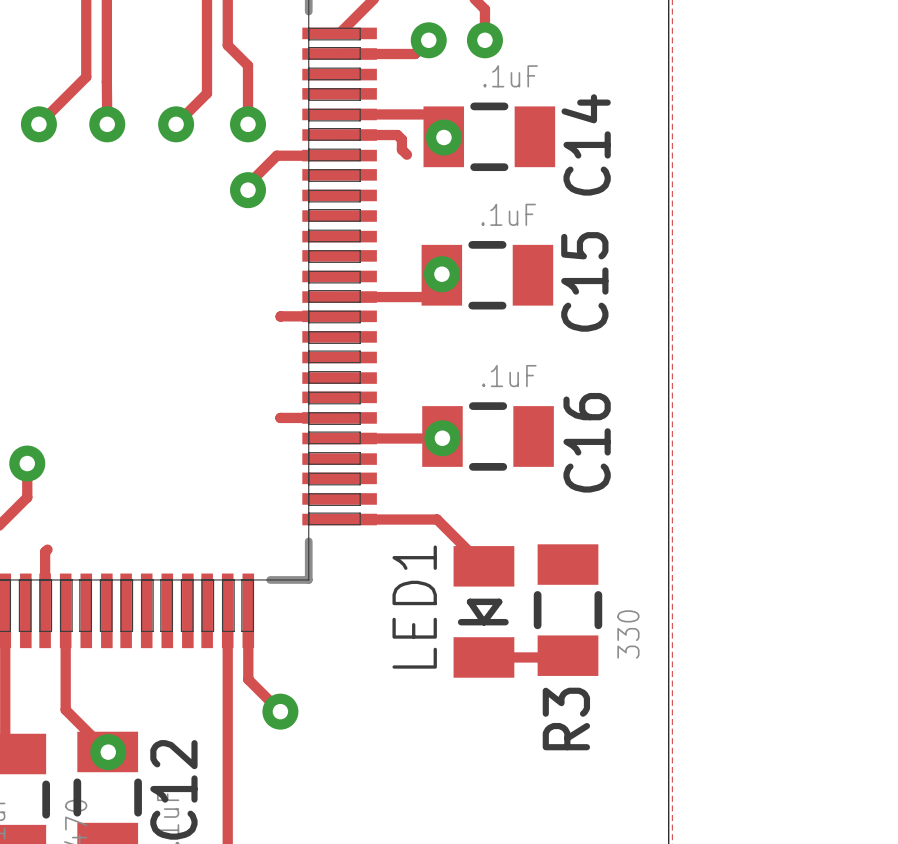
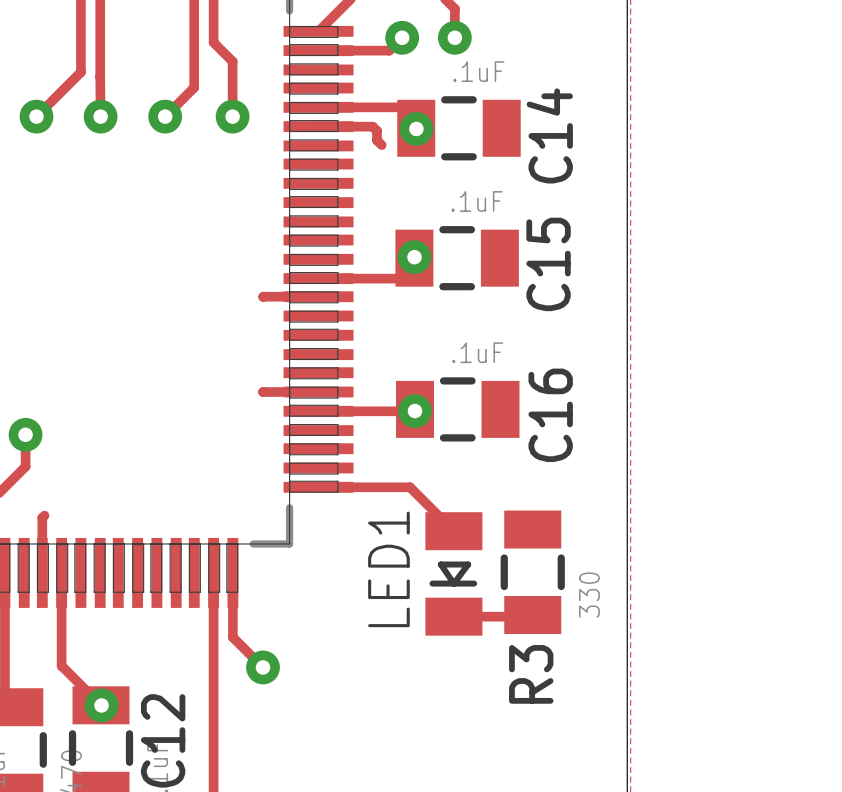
track: (339, 155) (276, 155) (248, 184) (248, 190) -> none
via: (248, 190) -> none

